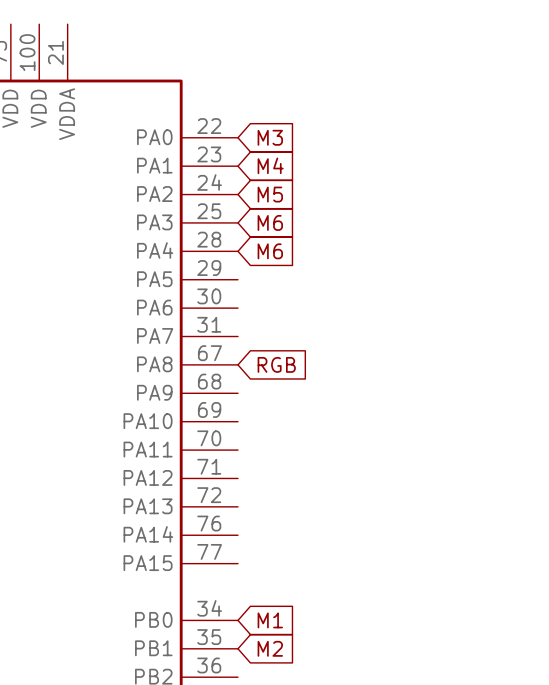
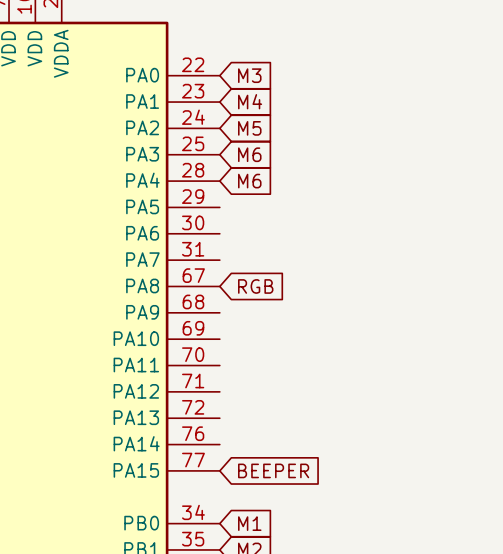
global label: none -> BEEPER (273, 470)

